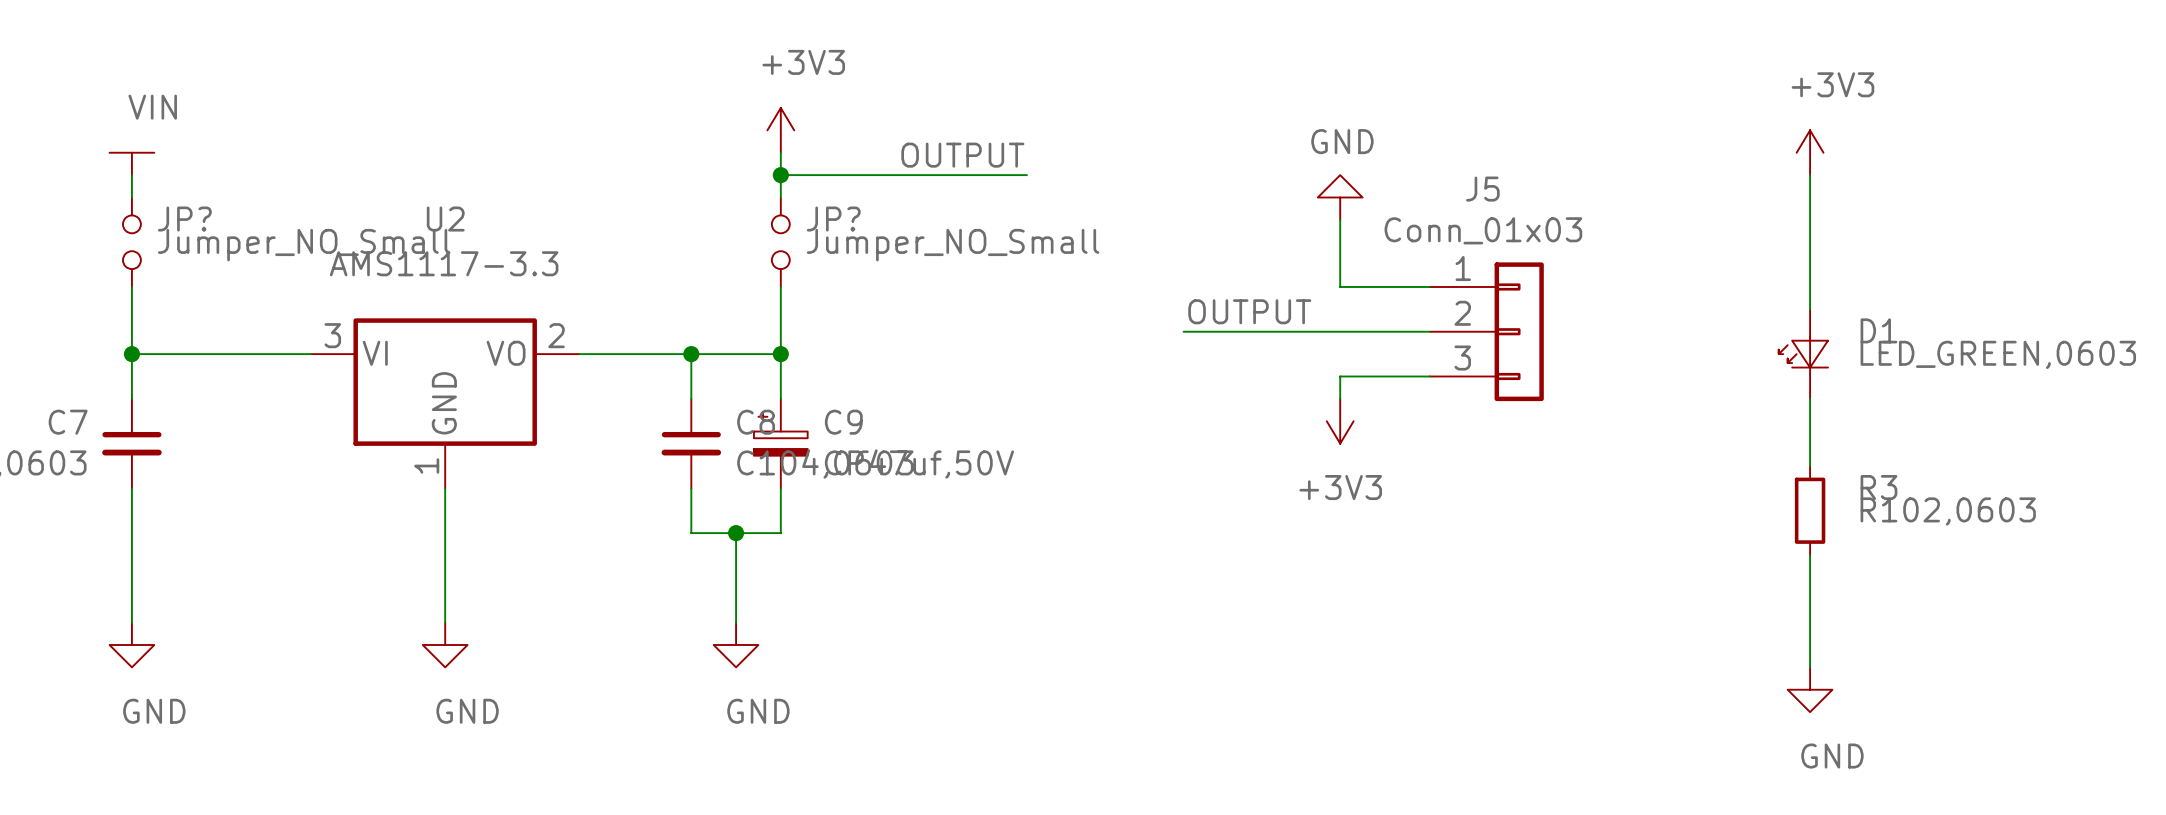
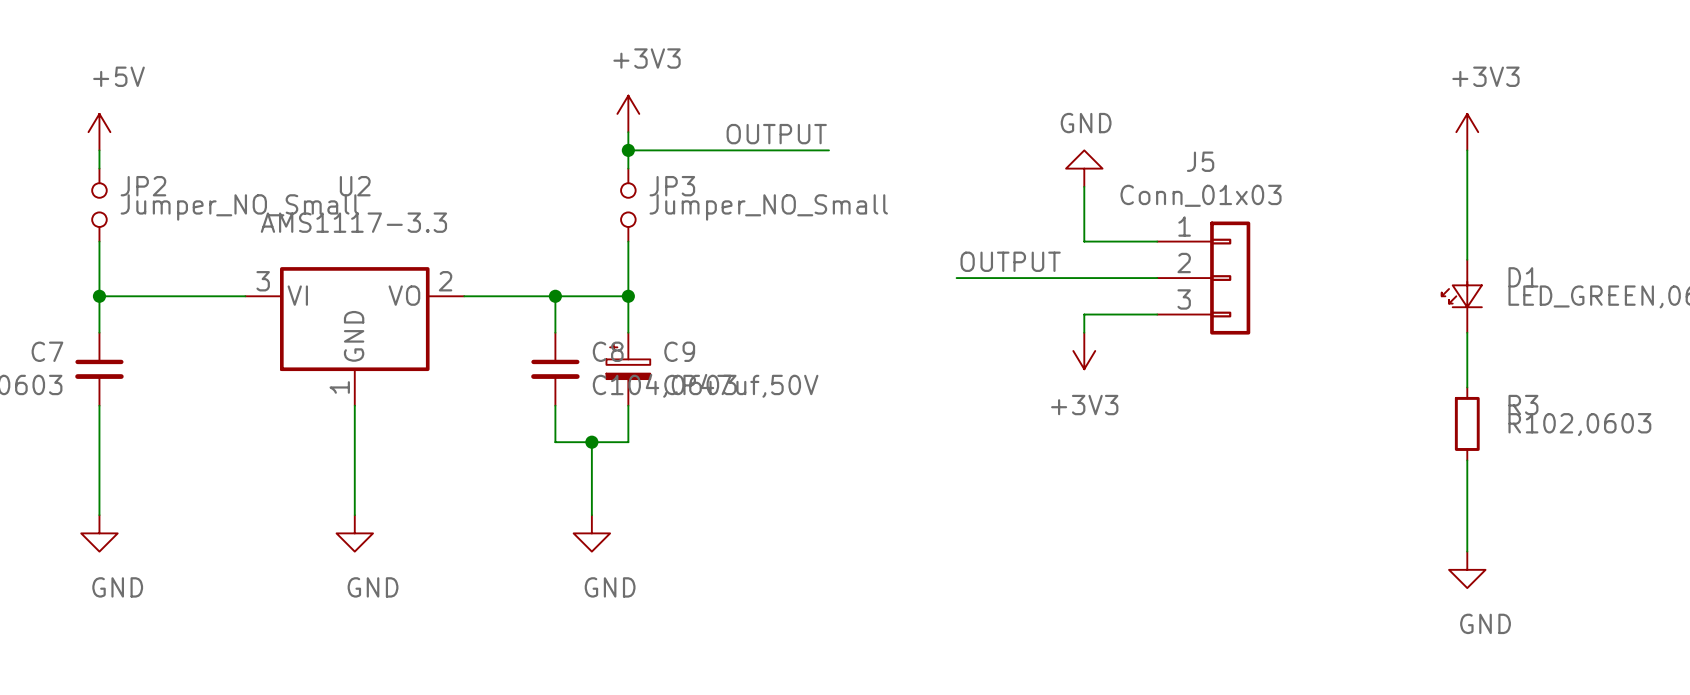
power symbol: VIN (131, 163) -> +5V (99, 132)
JP? name: JP? (184, 219) -> JP2 (143, 186)
JP? name: JP? (833, 219) -> JP3 (672, 186)

